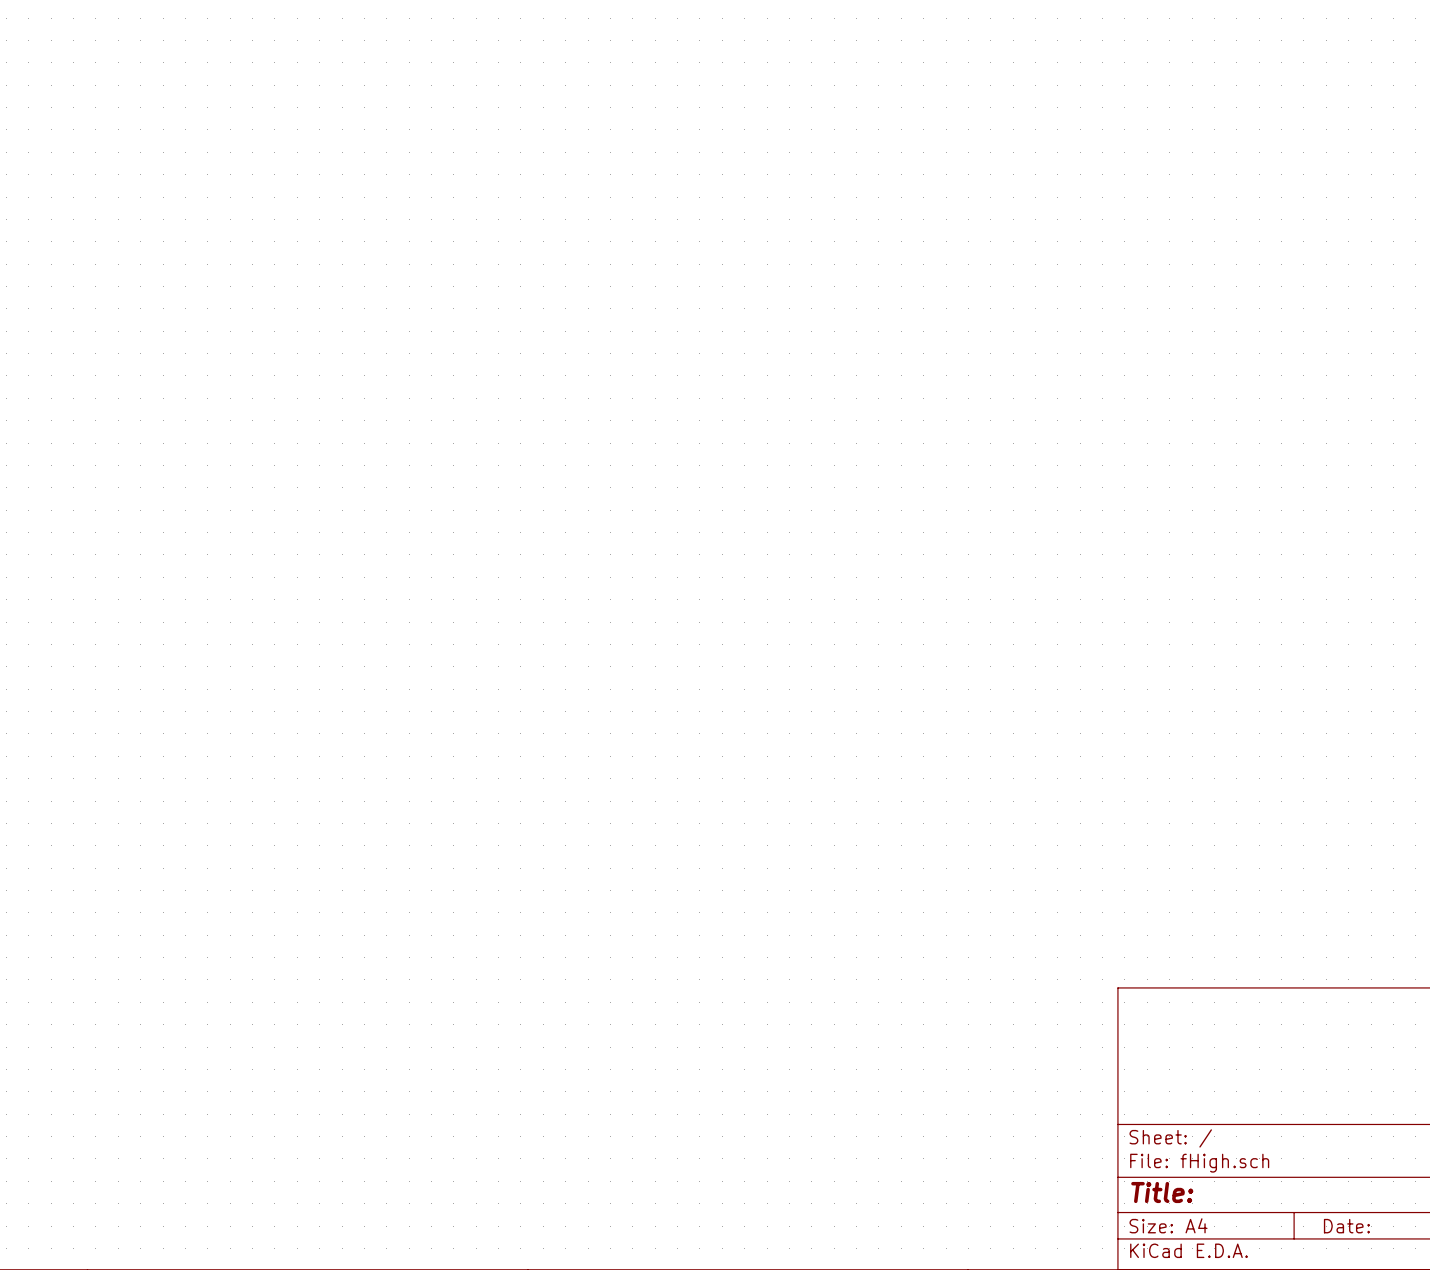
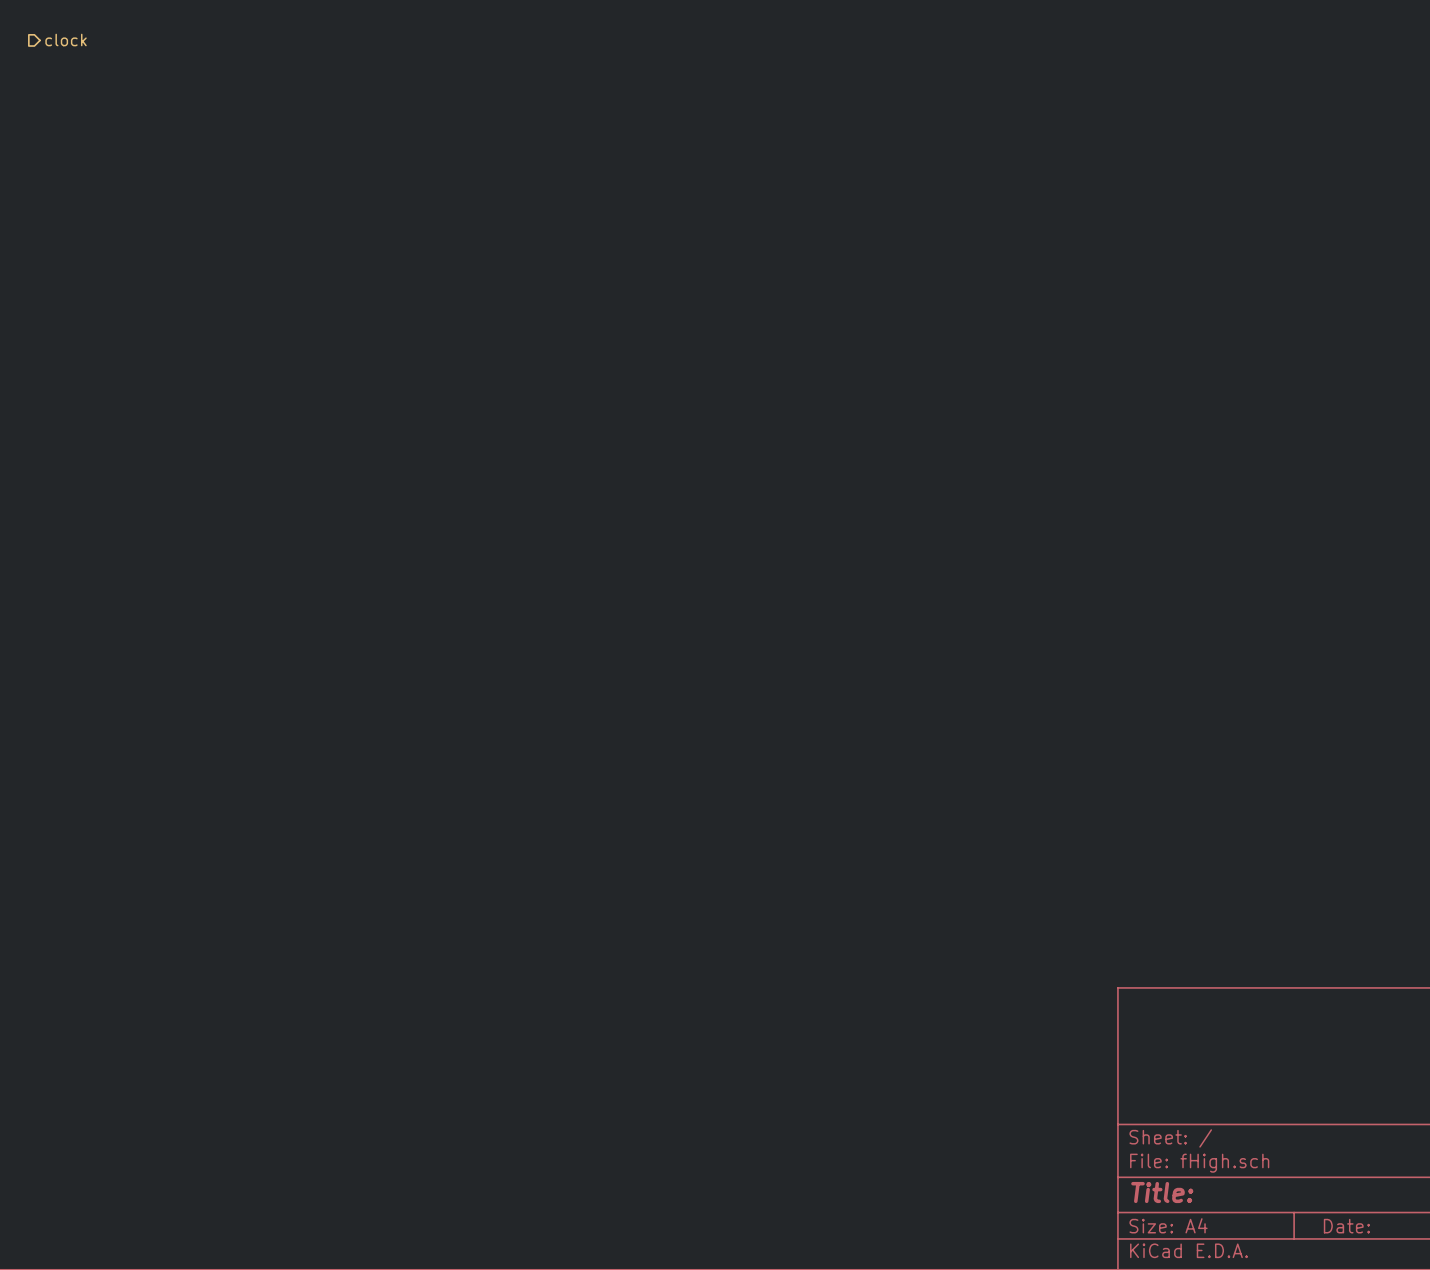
hierarchical label: none -> clock (66, 40)

